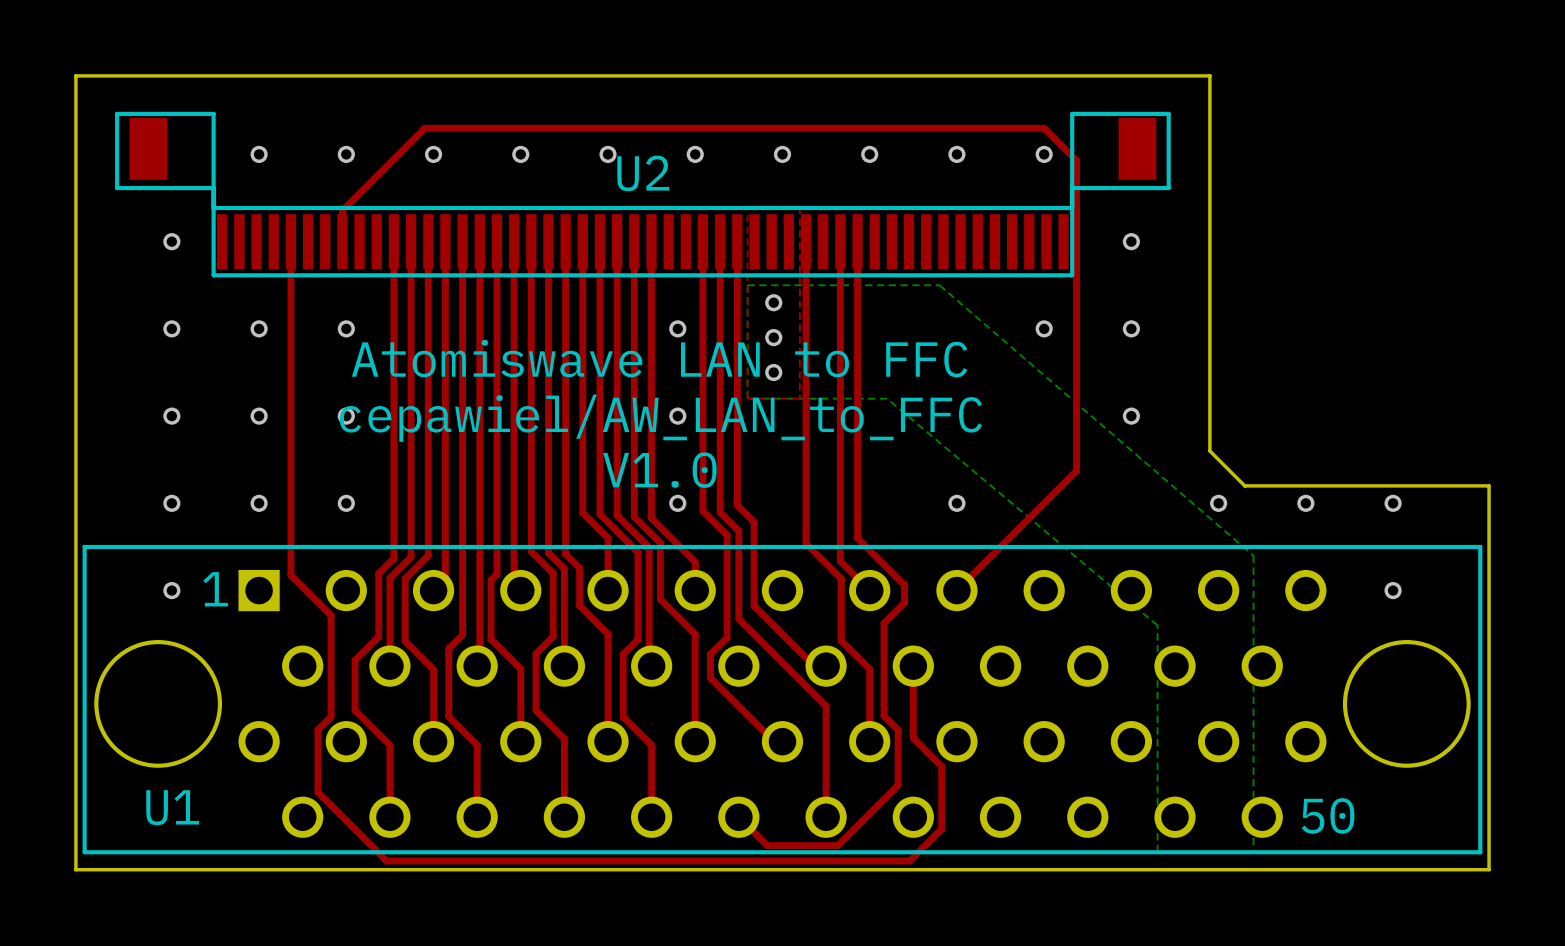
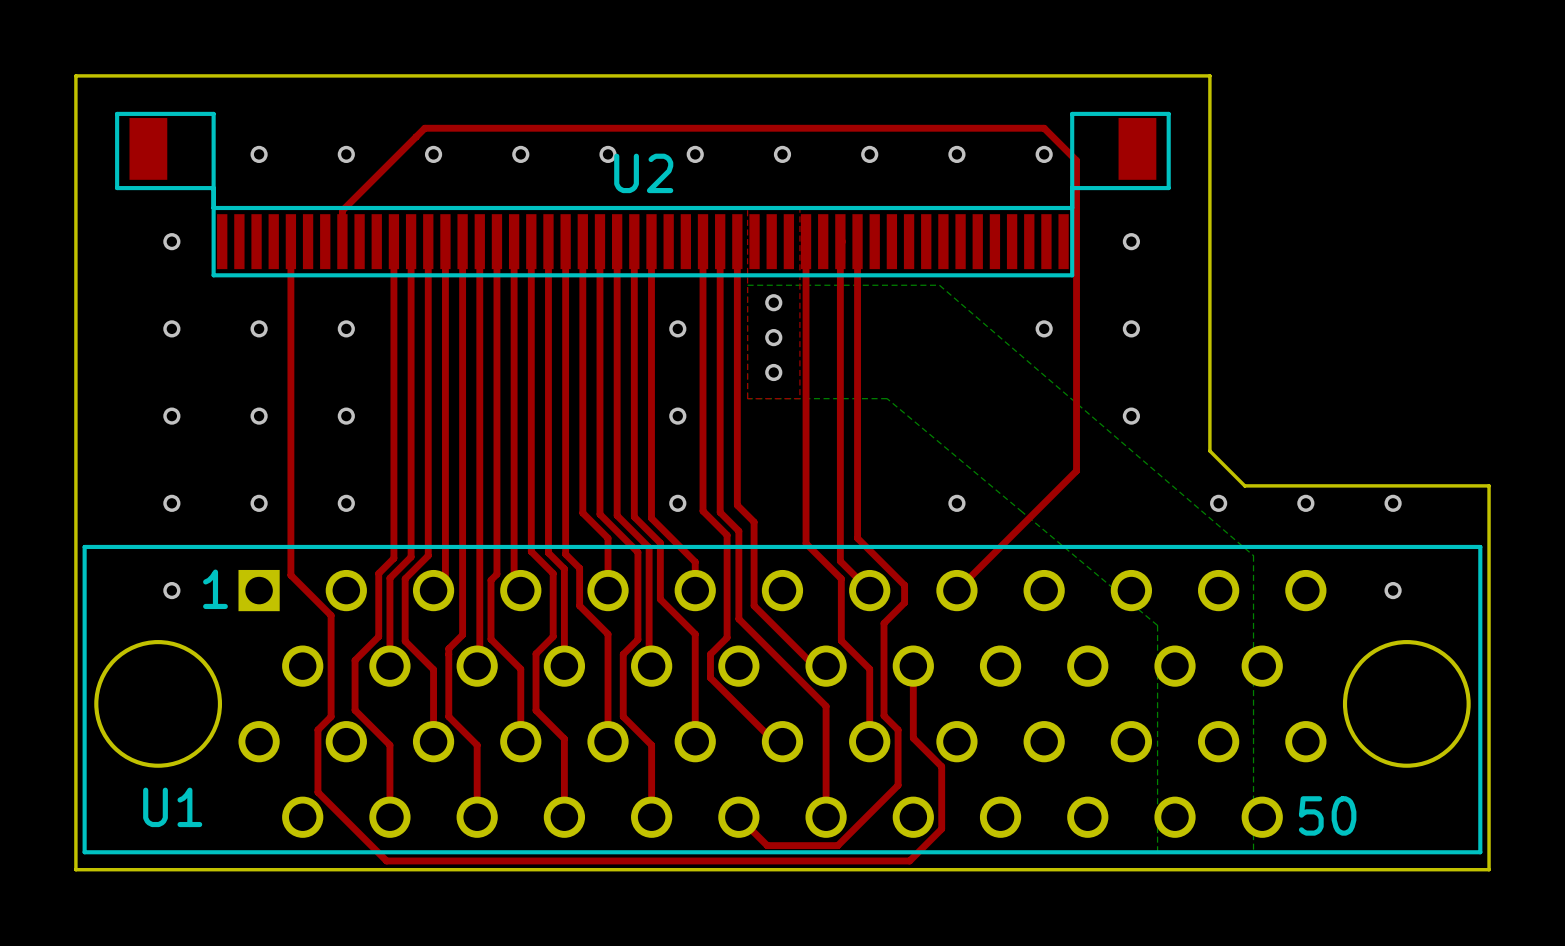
text: Atomiswave LAN to FFC (659, 358) -> none
text: cepawiel/AW_LAN_to_FFC (660, 418) -> none
text: V1.0 (659, 470) -> none

